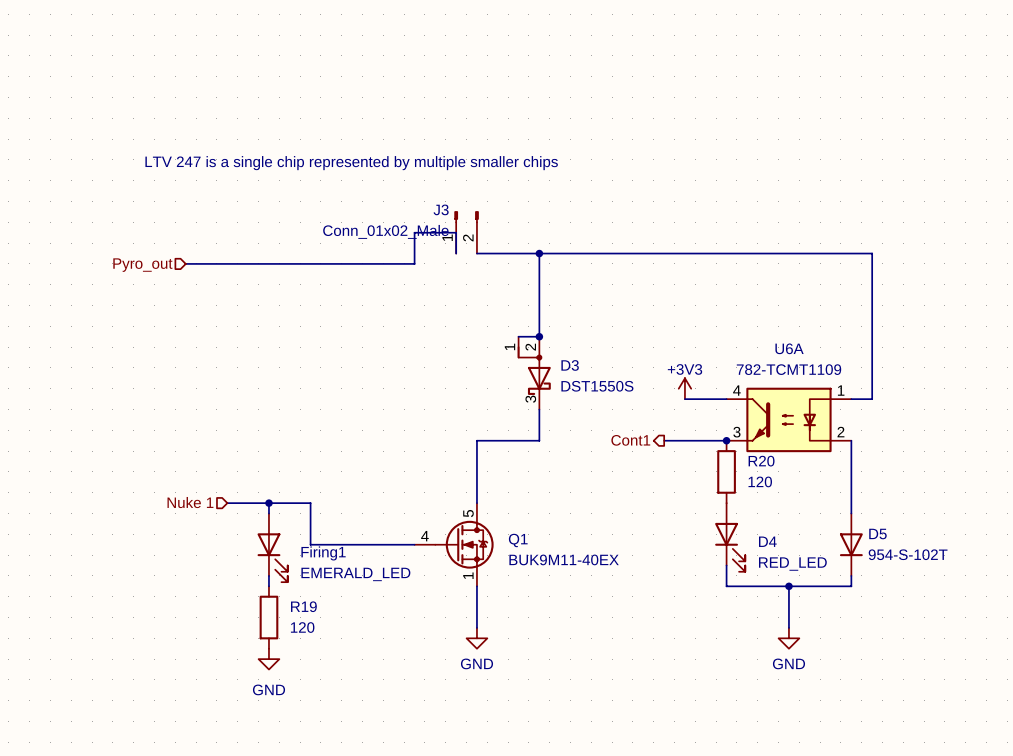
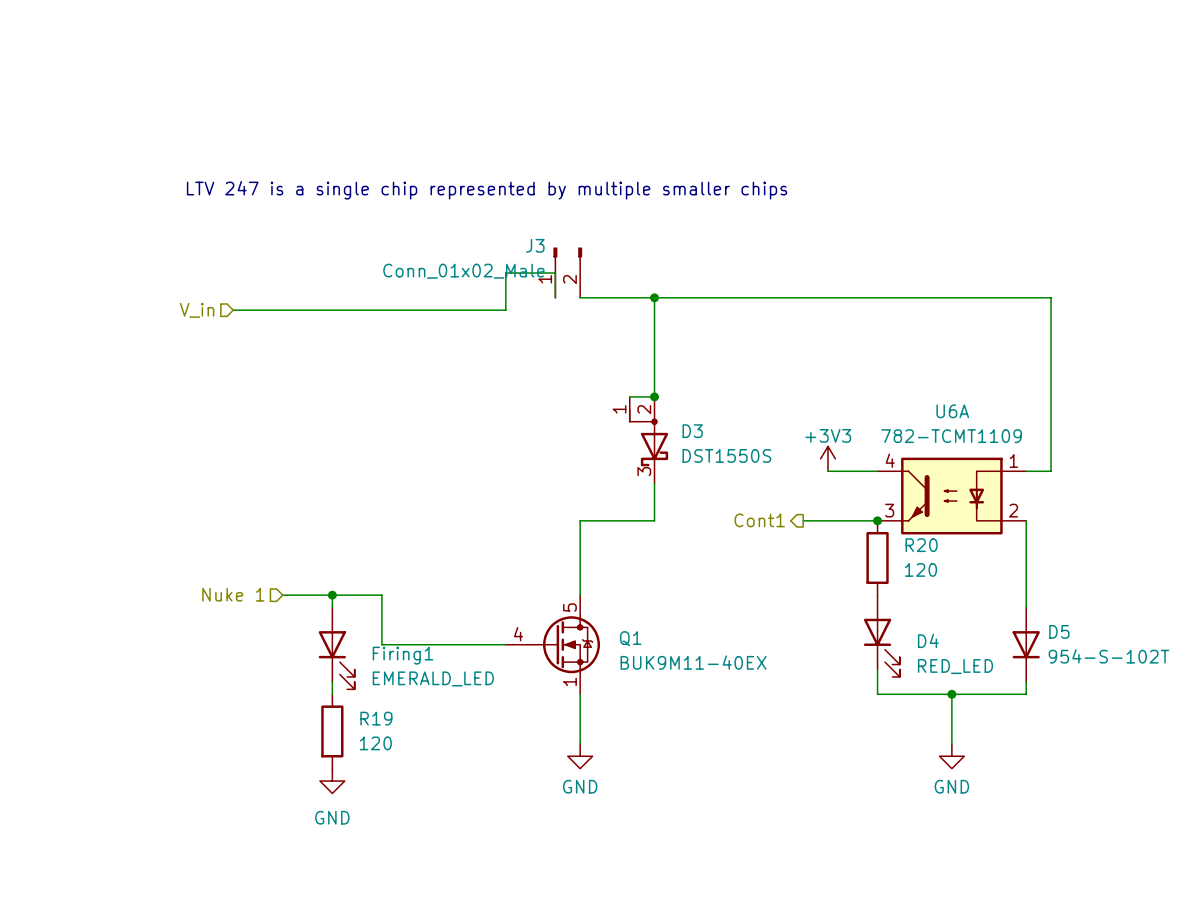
hierarchical label: Pyro_out (142, 265) -> V_in (197, 310)

